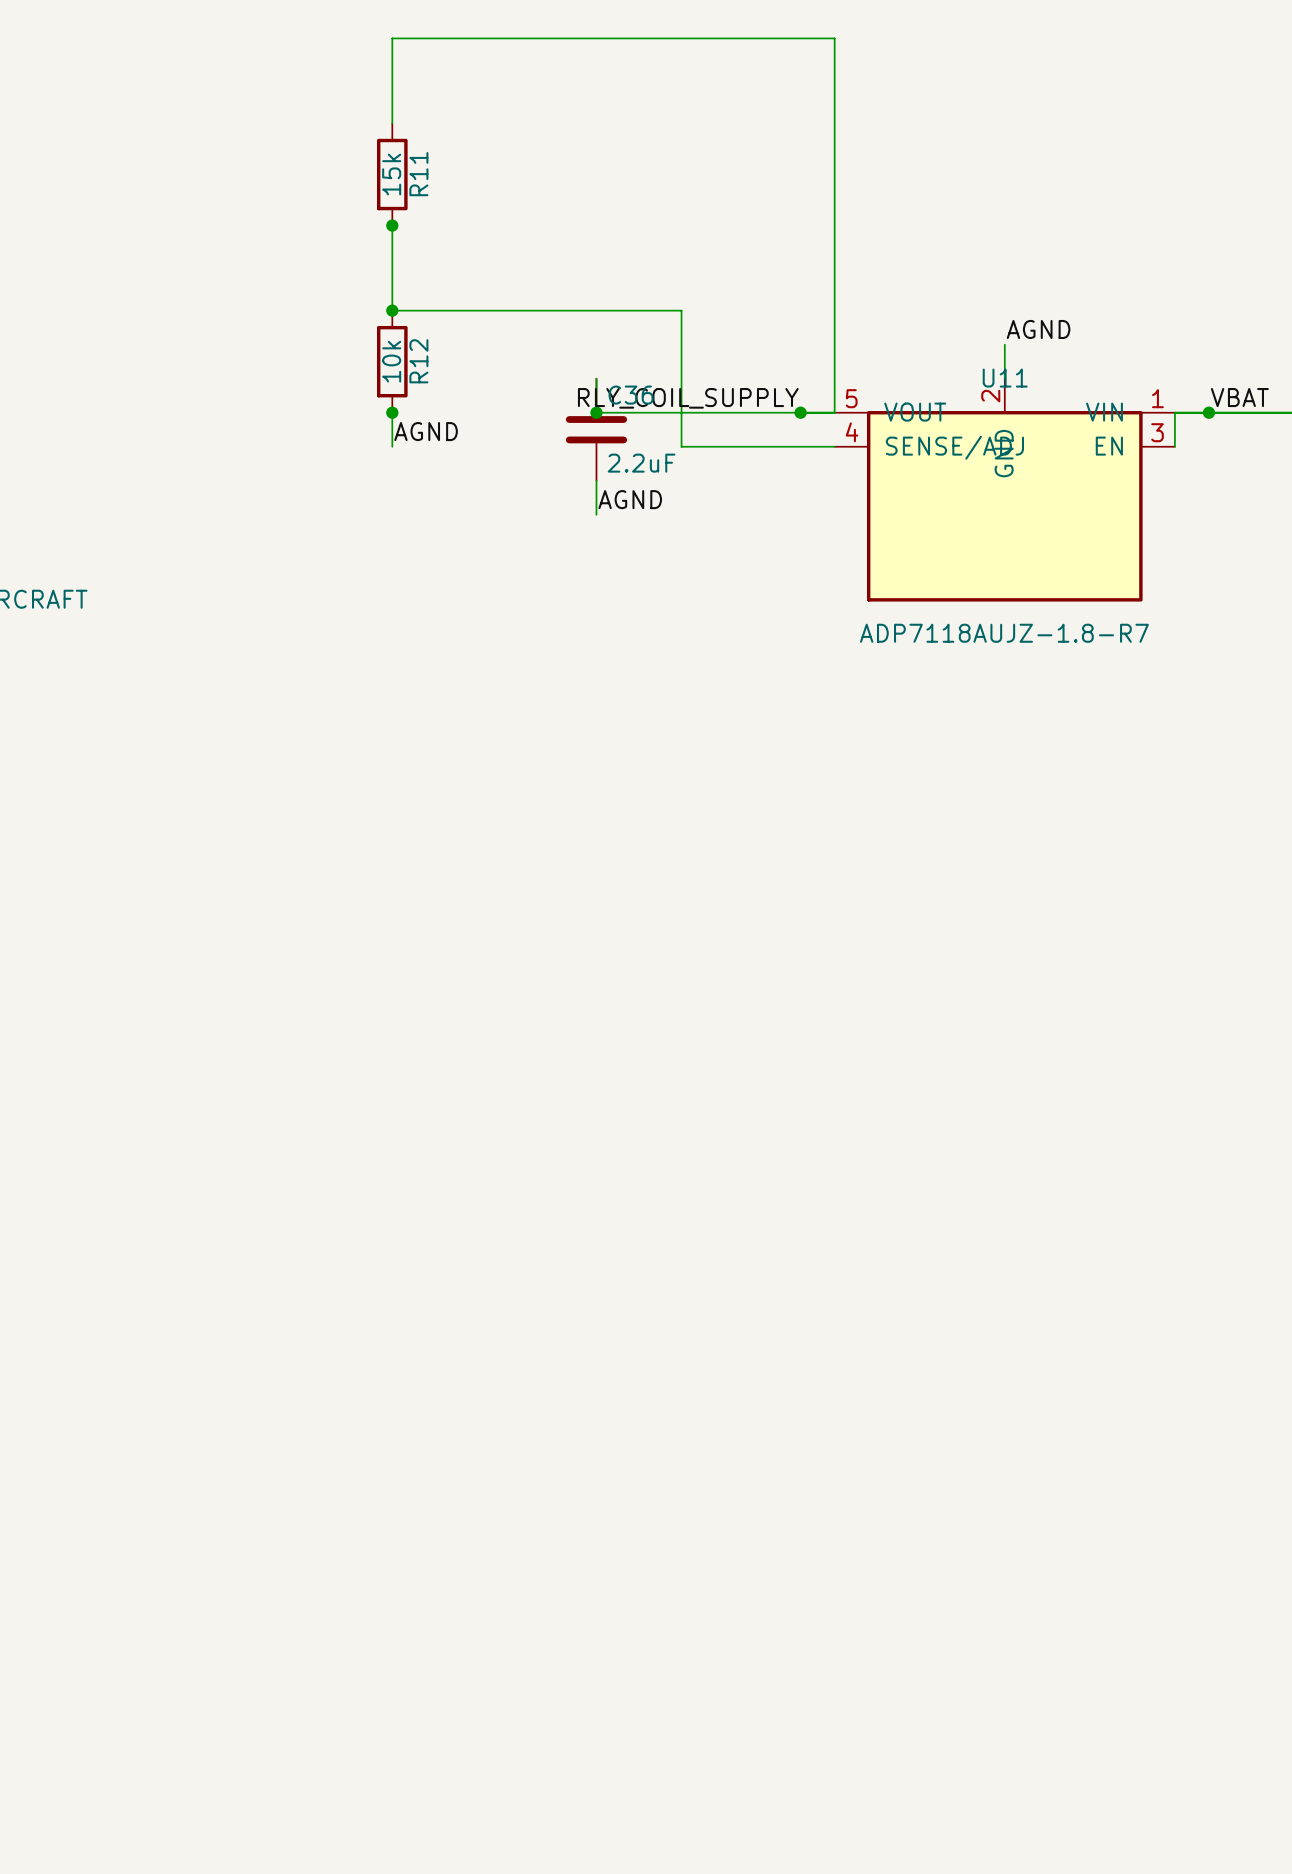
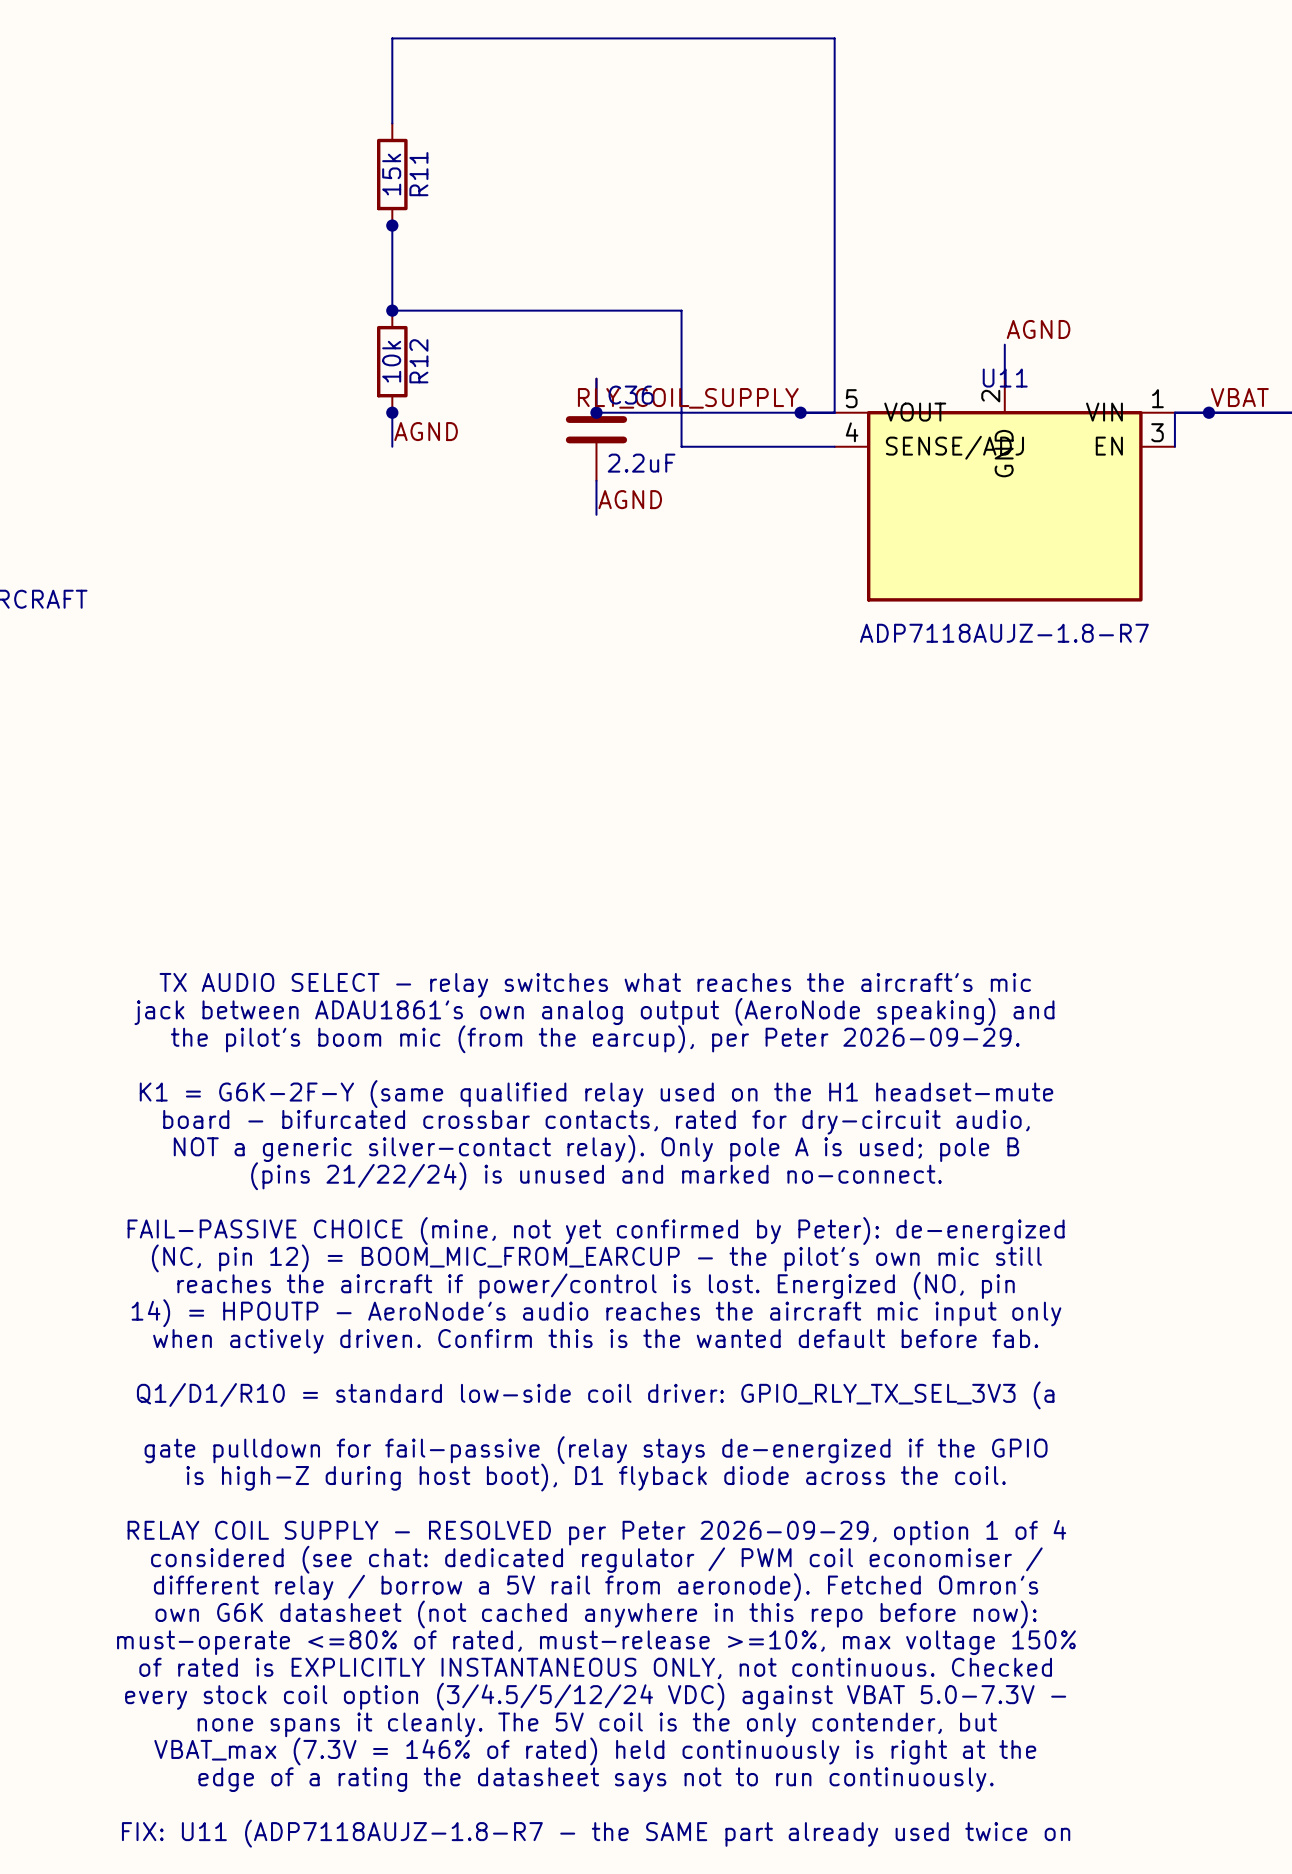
text: none -> TX AUDIO SELECT - relay switches what reaches the aircraft's mic (595, 985)
text: none -> jack between ADAU1861's own analog output (AeroNode speaking) and (594, 1011)
text: none -> the pilot's boom mic (from the earcup), per Peter 2026-09-29. (595, 1039)
text: none -> K1 = G6K-2F-Y (same qualified relay used on the H1 headset-mute (596, 1094)
text: none -> board - bifurcated crossbar contacts, rated for dry-circuit audio, (596, 1122)
text: none -> NOT a generic silver-contact relay). Only pole A is used; pole B (596, 1148)
text: none -> (pins 21/22/24) is unused and marked no-connect. (596, 1176)
text: none -> FAIL-PASSIVE CHOICE (mine, not yet confirmed by Peter): de-energized (596, 1231)
text: none -> (NC, pin 12) = BOOM_MIC_FROM_EARCUP - the pilot's own mic still (596, 1258)
text: none -> reaches the aircraft if power/control is lost. Energized (NO, pin (596, 1285)
text: none -> 14) = HPOUTP - AeroNode's audio reaches the aircraft mic input only (596, 1313)
text: none -> when actively driven. Confirm this is the wanted default before fab. (595, 1341)
text: none -> Q1/D1/R10 = standard low-side coil driver: GPIO_RLY_TX_SEL_3V3 (a (595, 1395)
text: none -> gate pulldown for fail-passive (relay stays de-energized if the GPIO (596, 1450)
text: none -> is high-Z during host boot), D1 flyback diode across the coil. (596, 1477)
text: none -> RELAY COIL SUPPLY - RESOLVED per Peter 2026-09-29, option 1 of 4 (596, 1532)
text: none -> considered (see chat: dedicated regulator / PWM coil economiser / (596, 1559)
text: none -> different relay / borrow a 5V rail from aeronode). Fetched Omron's (596, 1587)
text: none -> own G6K datasheet (not cached anywhere in this repo before now): (596, 1614)
text: none -> must-operate <=80% of rated, must-release >=10%, max voltage 150% (596, 1642)
text: none -> of rated is EXPLICITLY INSTANTANEOUS ONLY, not continuous. Checked (595, 1668)
text: none -> every stock coil option (3/4.5/5/12/24 VDC) against VBAT 5.0-7.3V - (595, 1696)
text: none -> none spans it cleanly. The 5V coil is the only contender, but (597, 1724)
text: none -> VBAT_max (7.3V = 146% of rated) held continuously is right at the (595, 1751)
text: none -> edge of a rating the datasheet says not to run continuously. (596, 1779)
text: none -> FIX: U11 (ADP7118AUJZ-1.8-R7 - the SAME part already used twice on (596, 1833)

